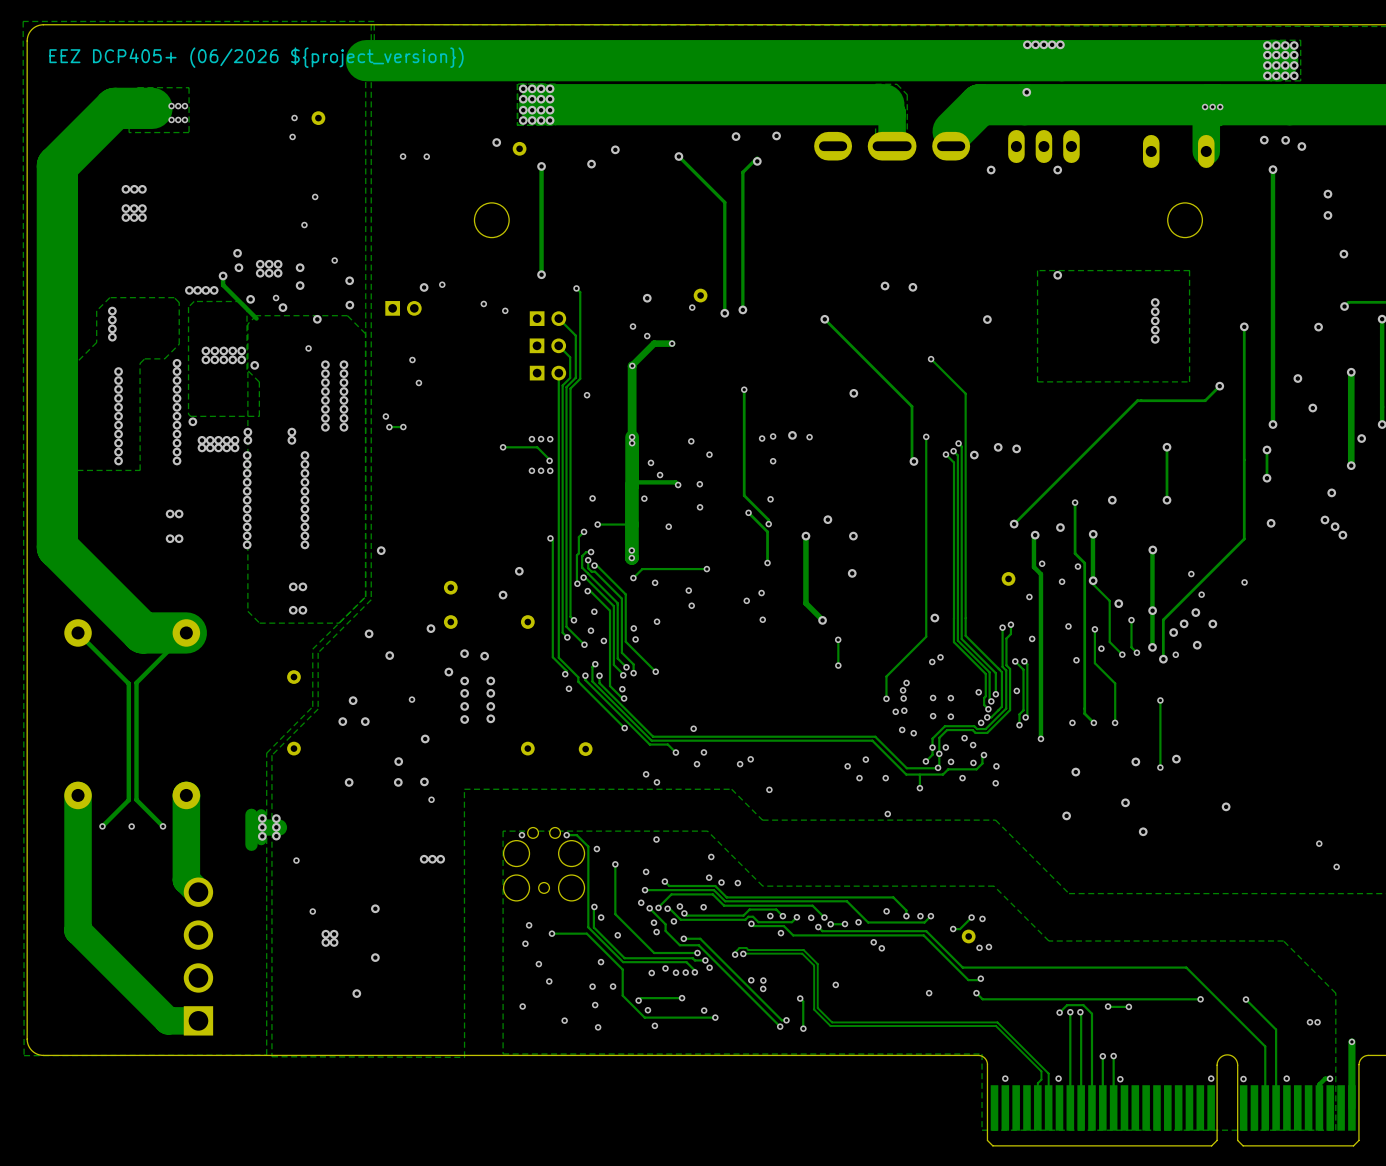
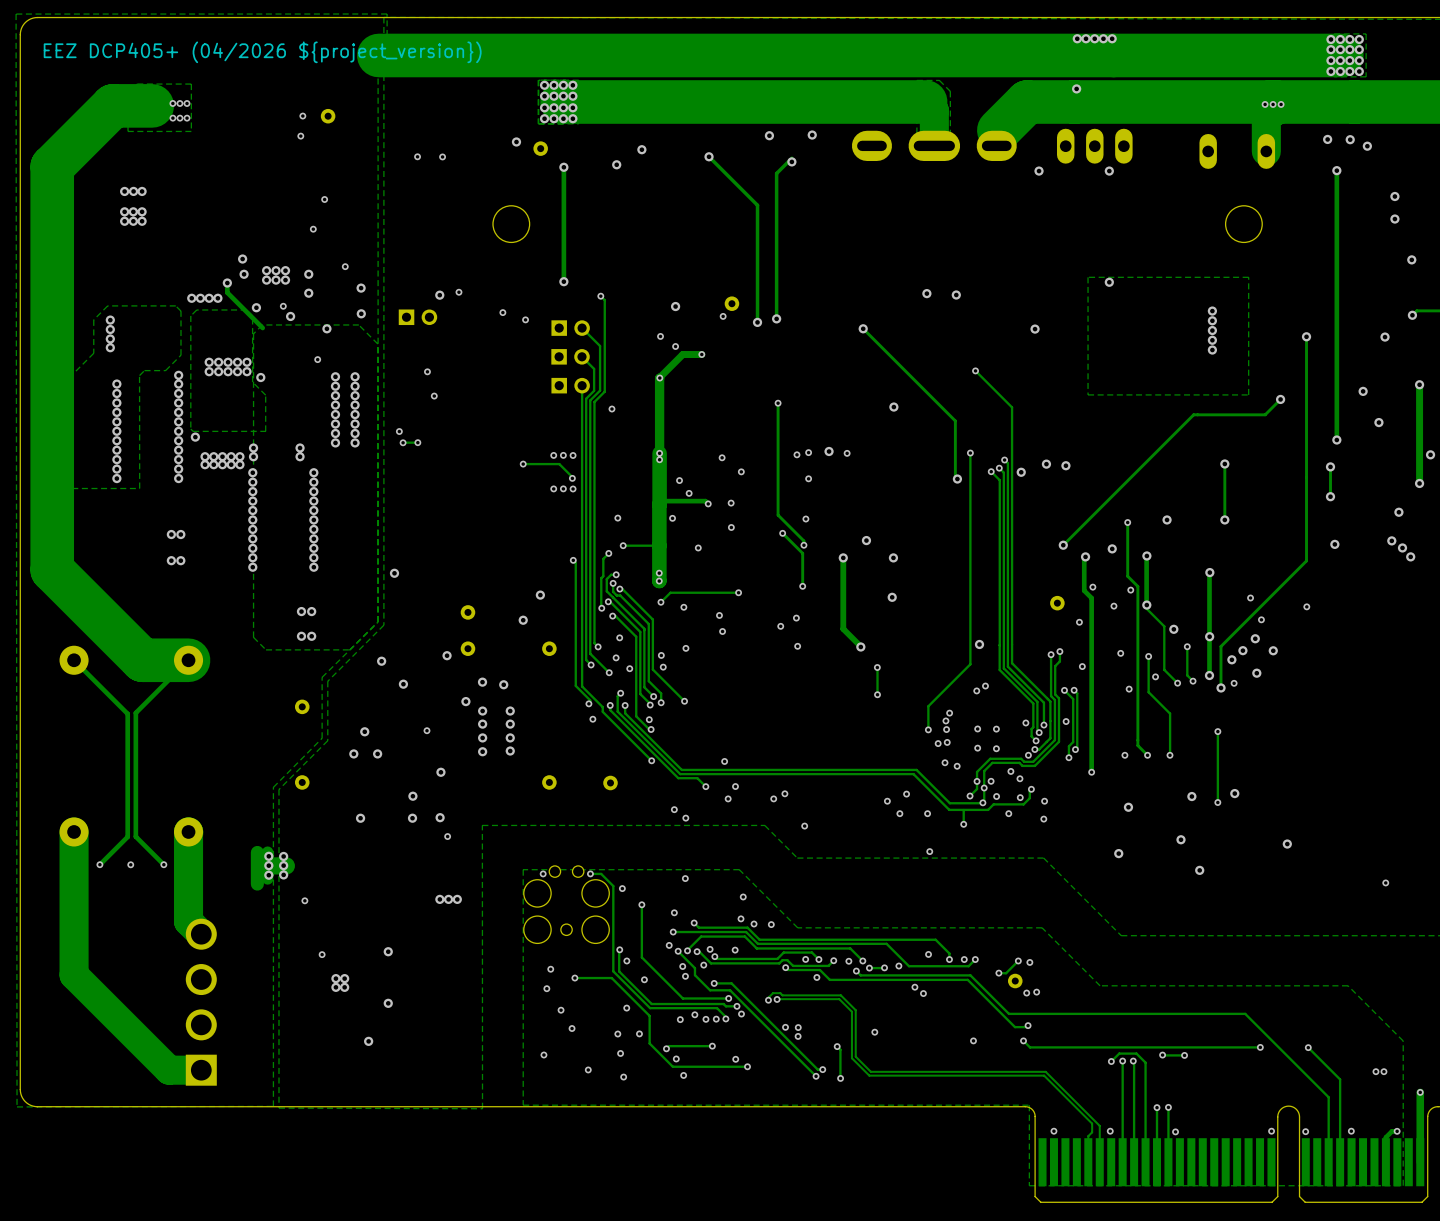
text: EEZ DCP405+ (06/2026 ${project_version}) (256, 57) -> EEZ DCP405+ (04/2026 ${project_version}) (262, 52)
via: (1336, 866) -> none

